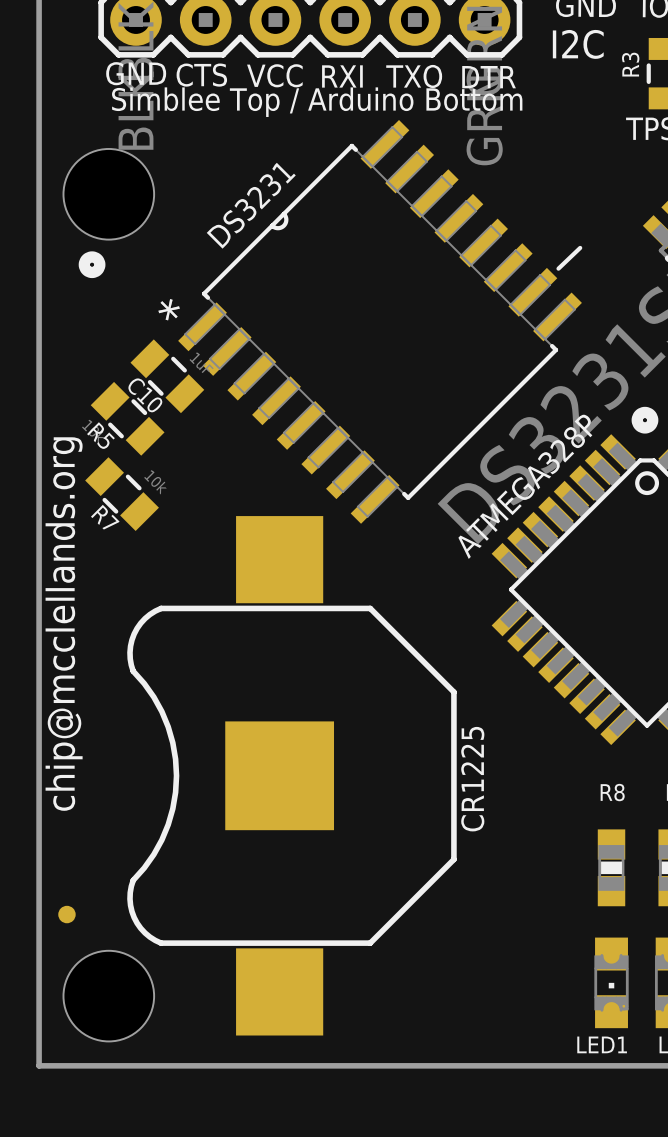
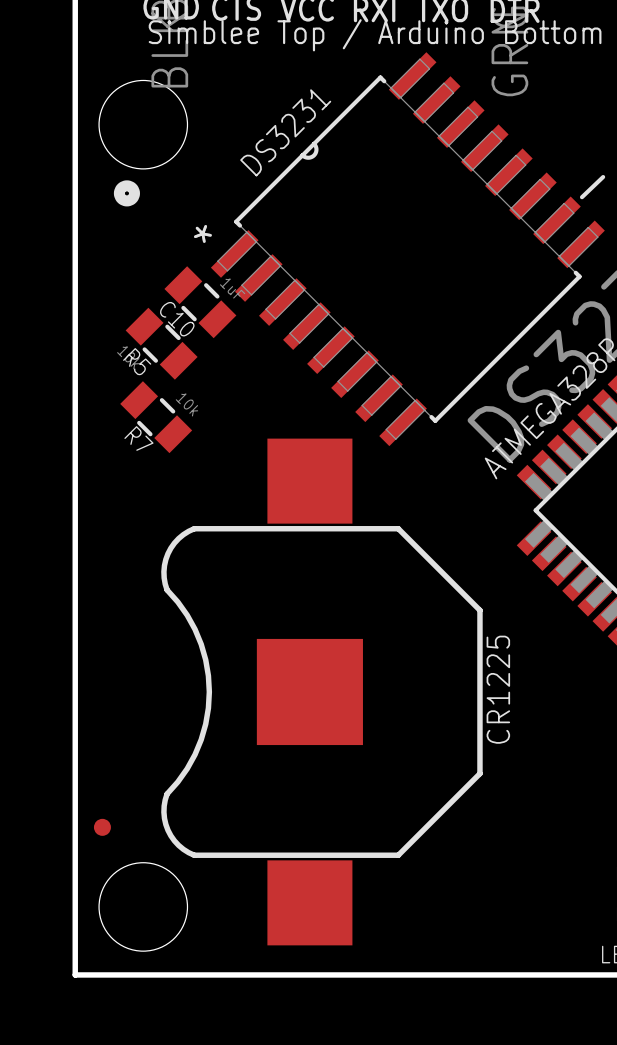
text: chip@mcclellands.org (64, 624) -> none

